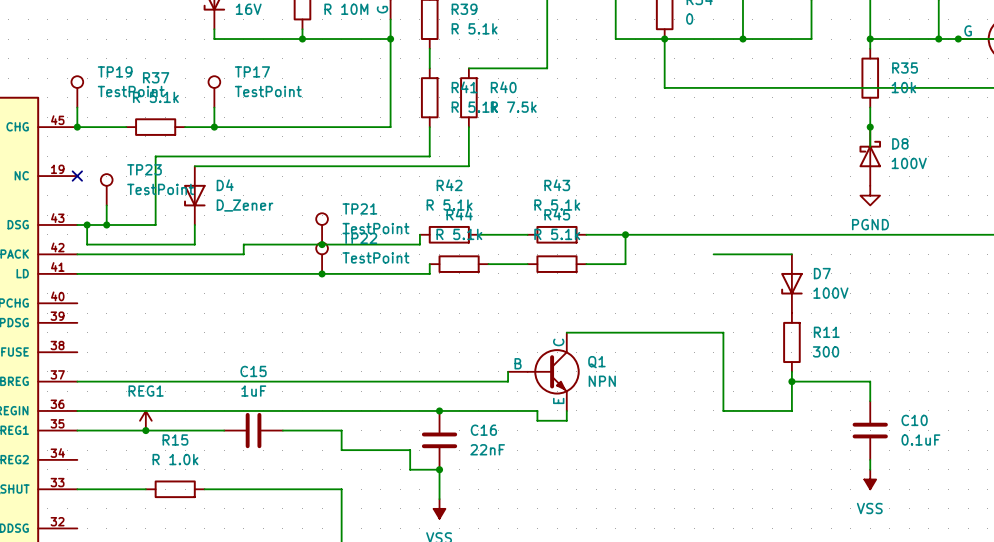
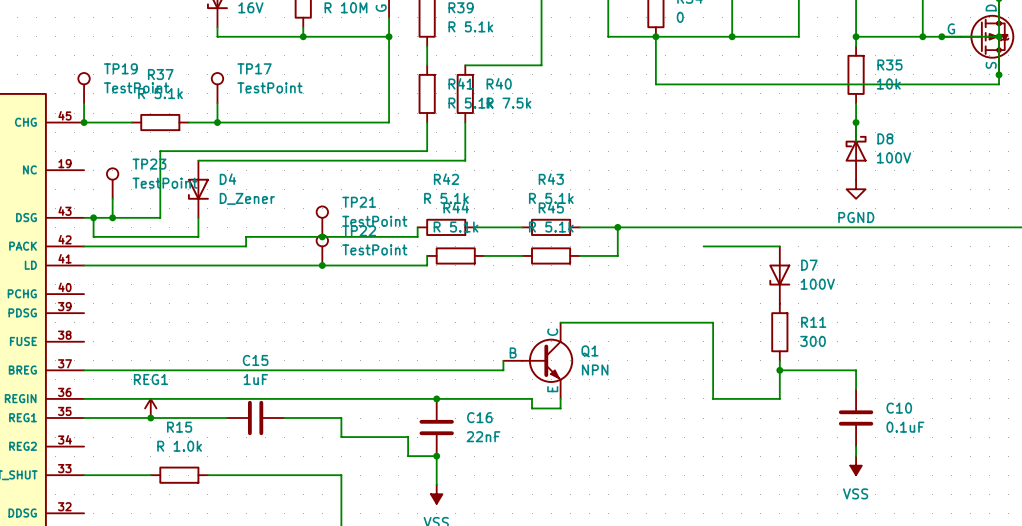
no-connect mark: (77, 176) -> none

